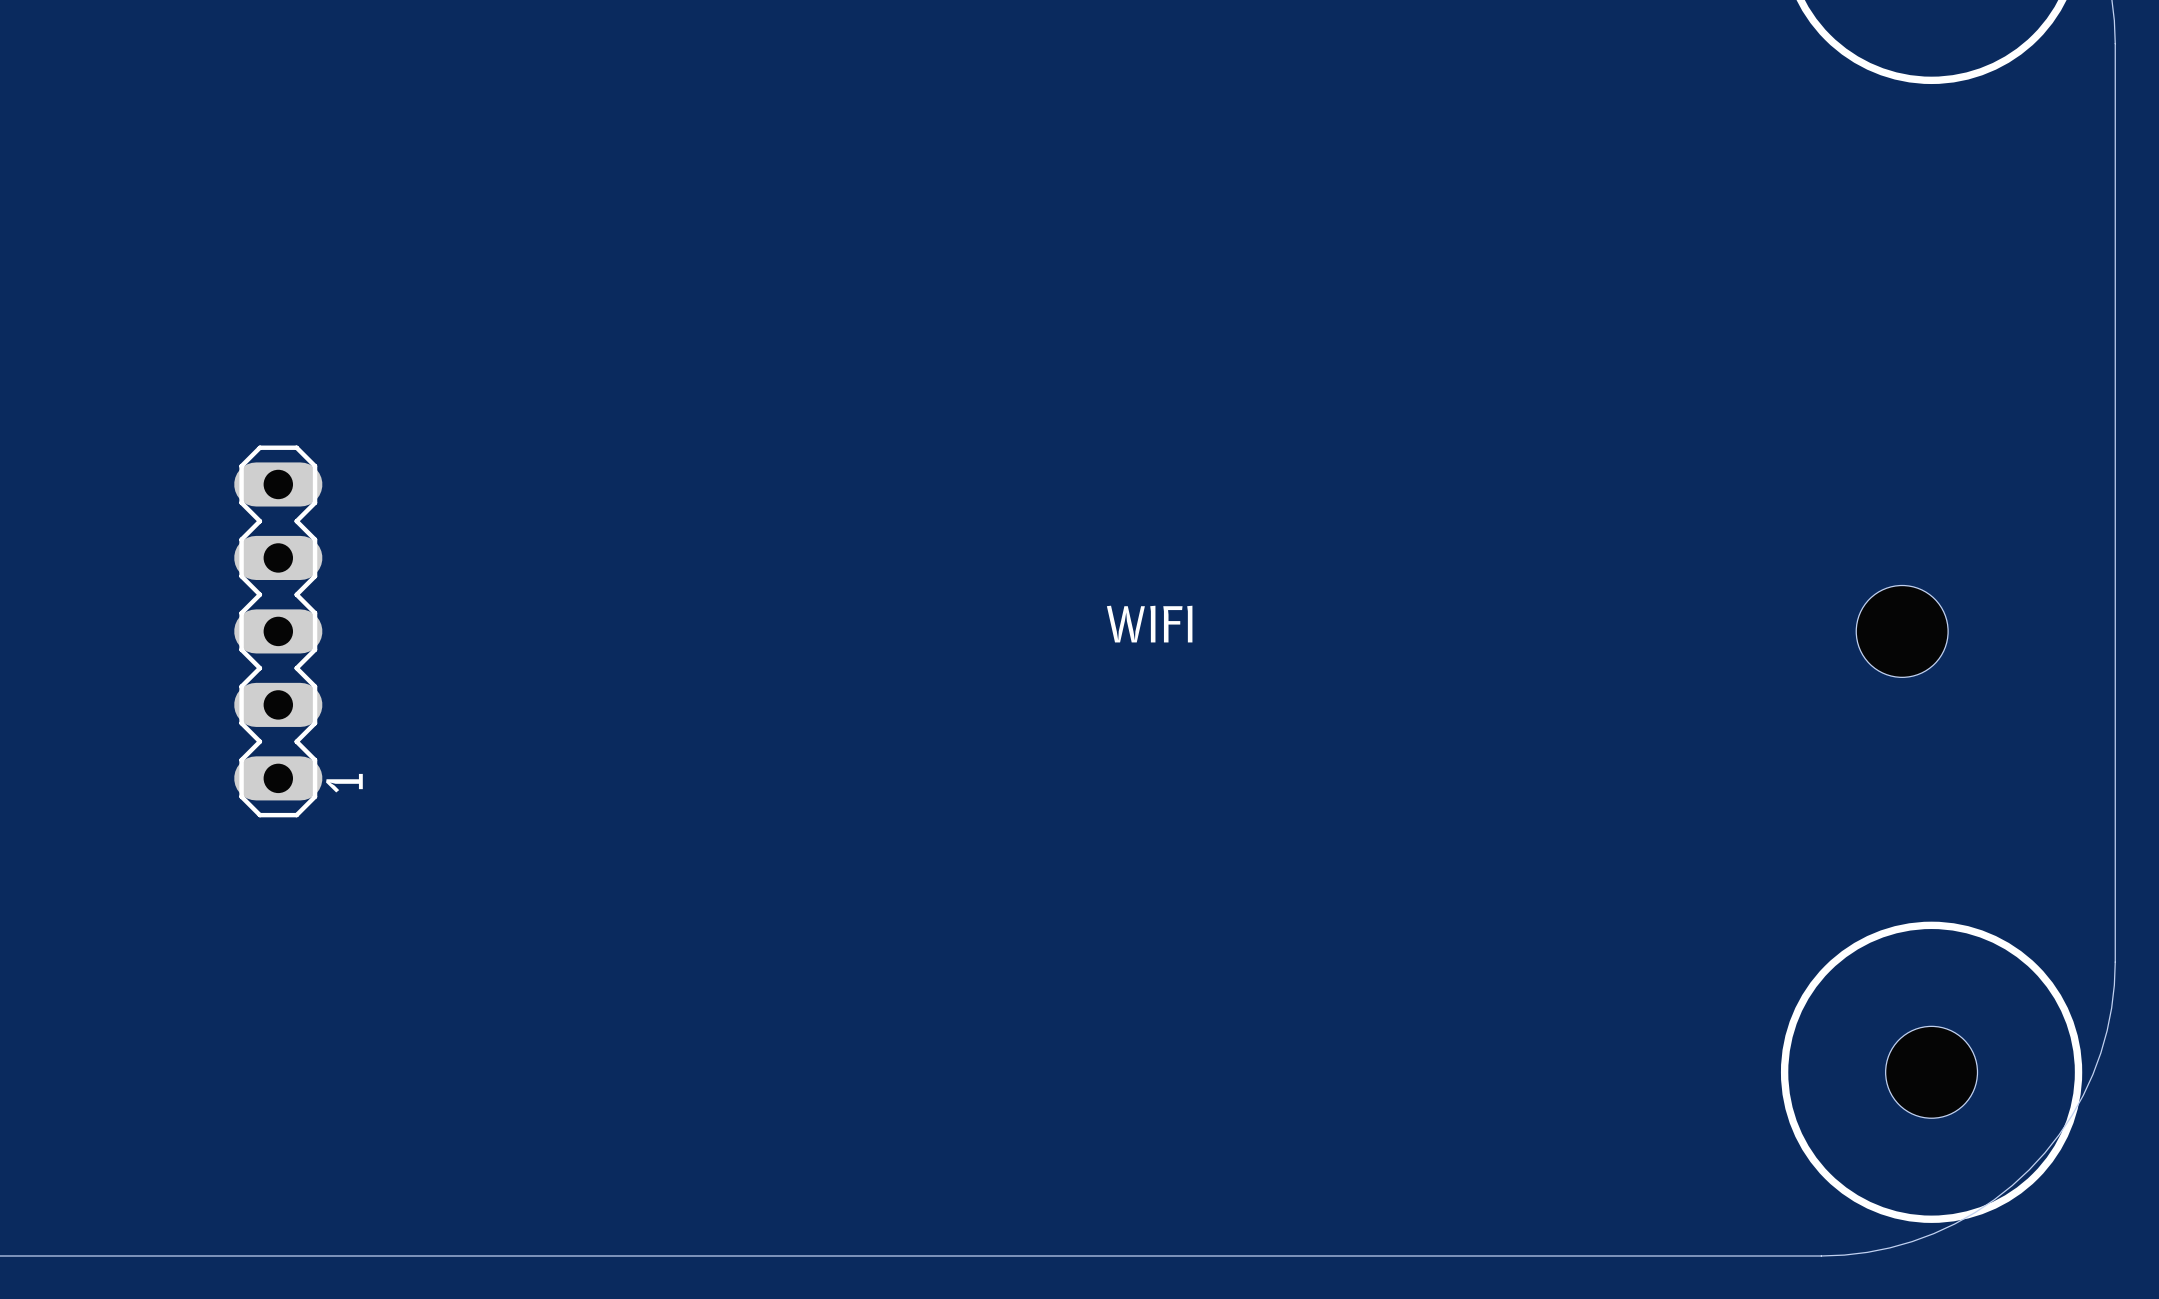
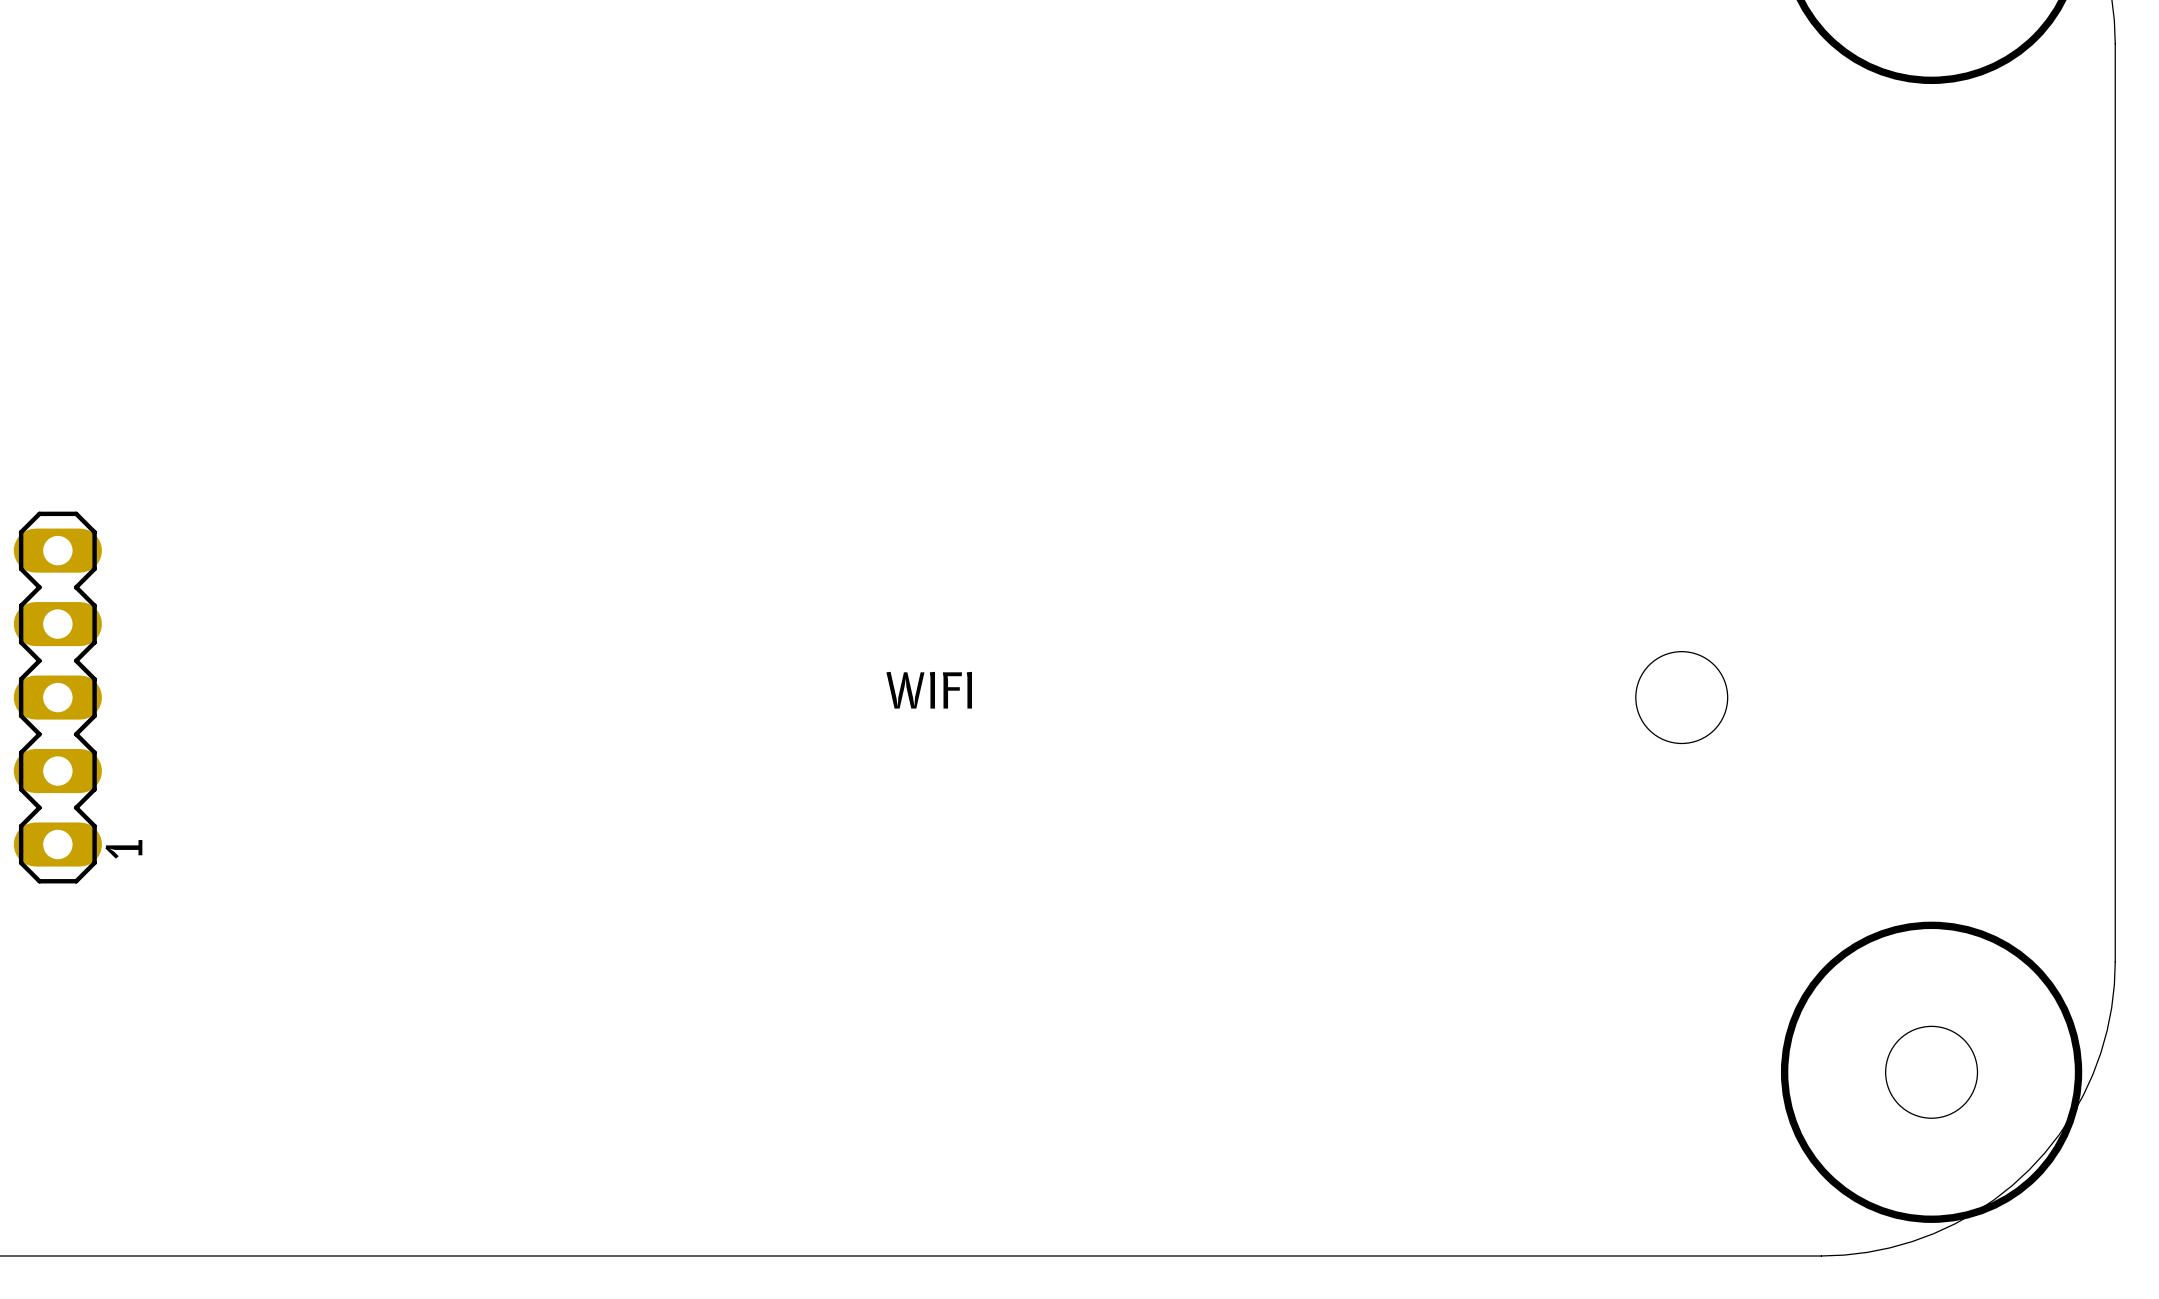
WIFI position: (1091, 631) -> (870, 697)

